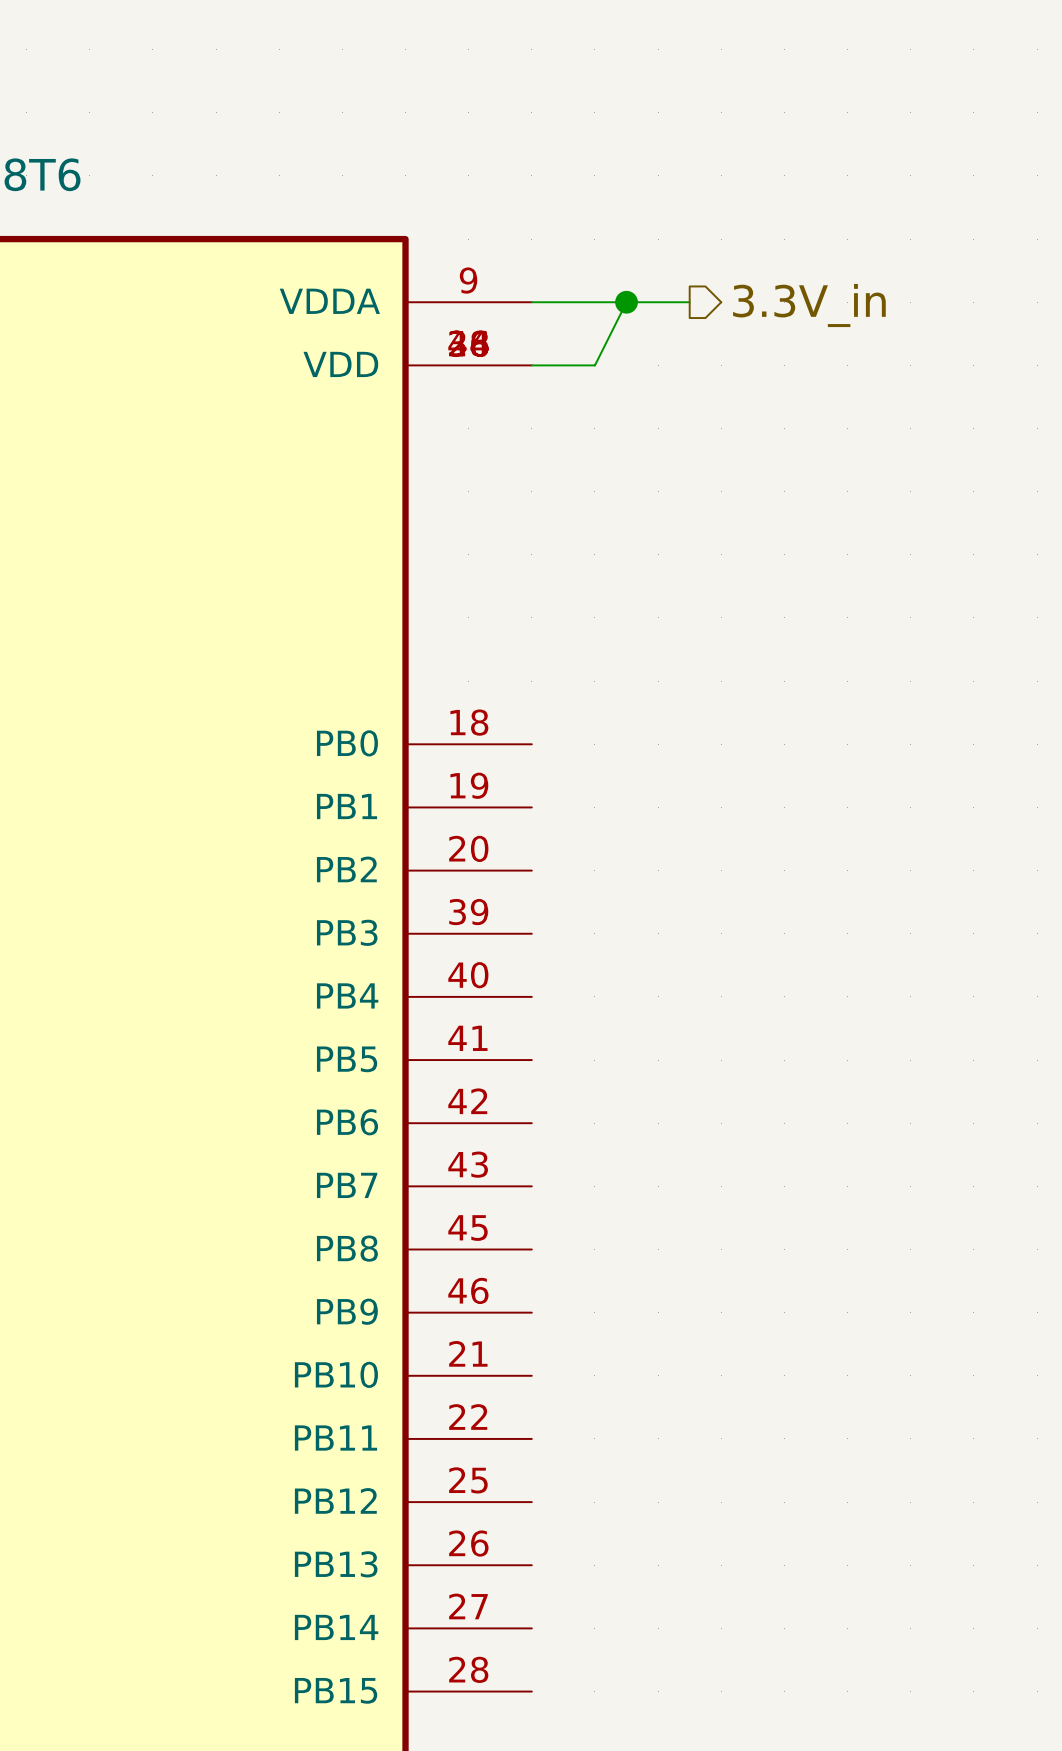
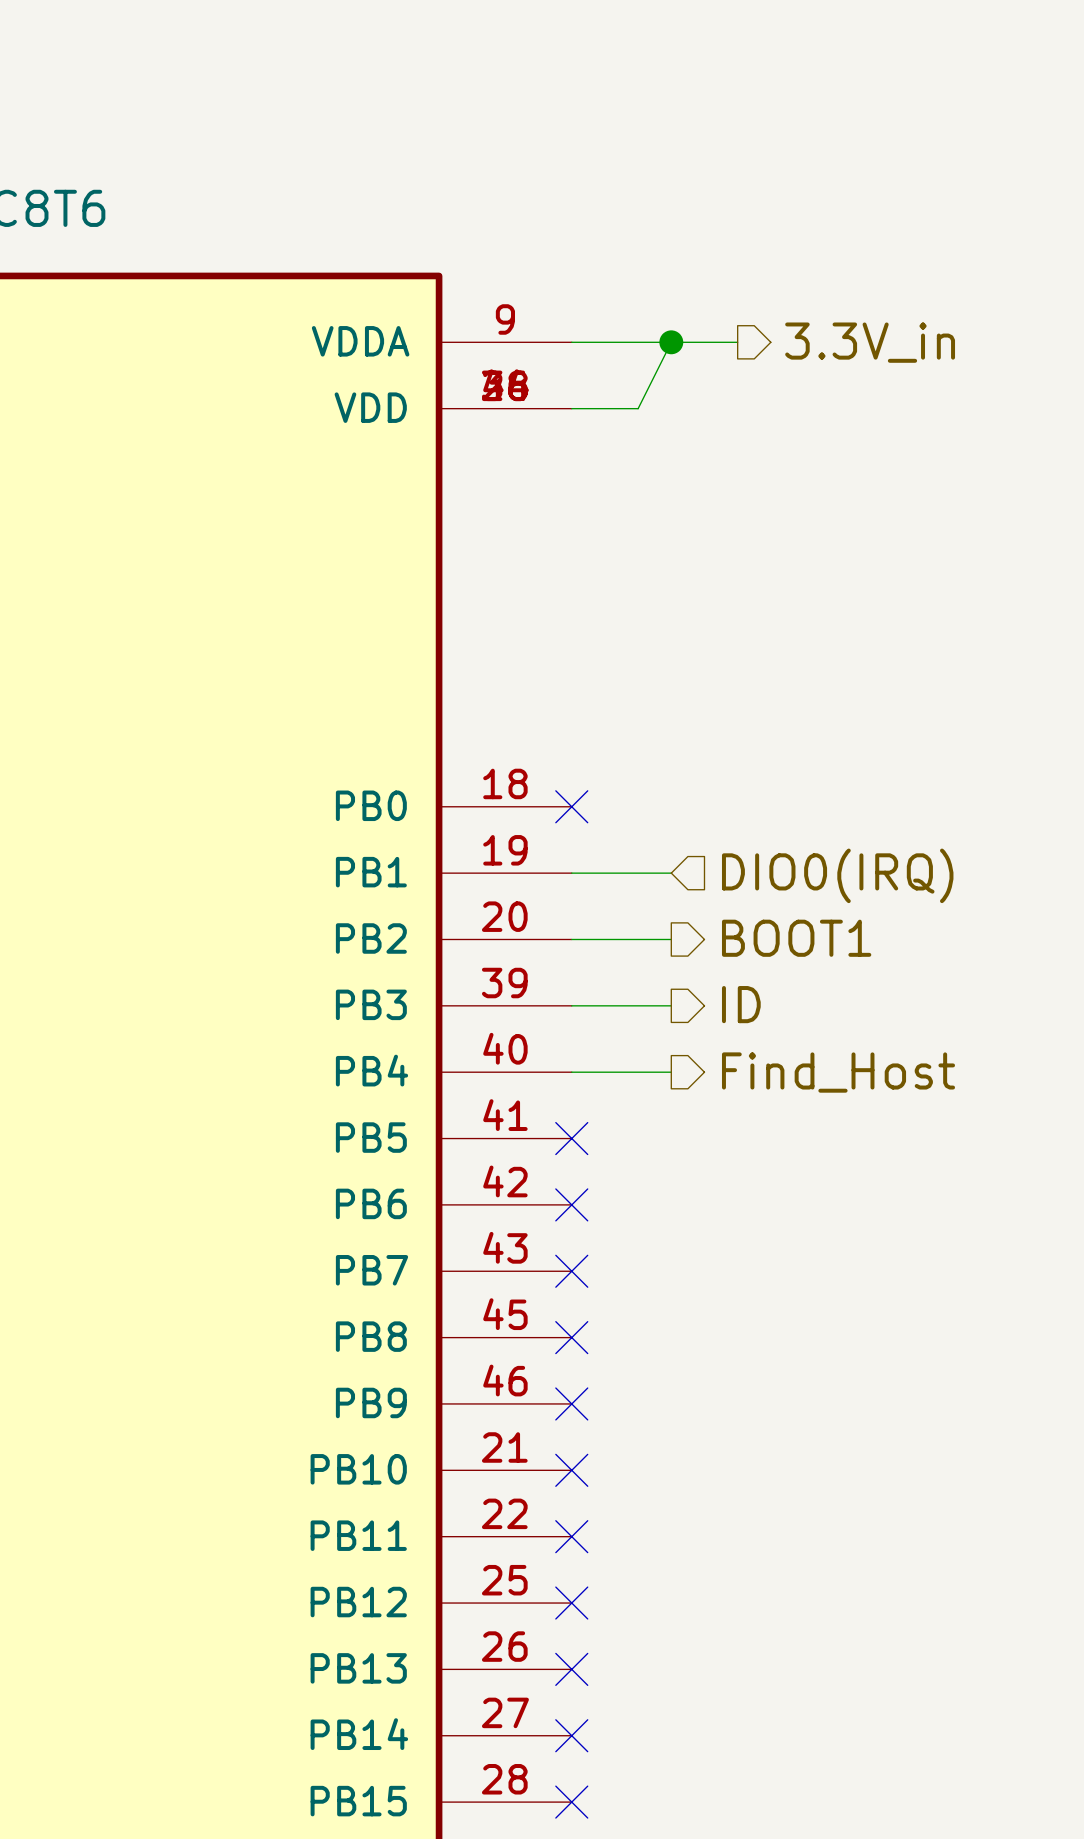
no-connect mark: none -> (571, 806)
wire: none -> (571, 873) (671, 873)
hierarchical label: none -> DIO0(IRQ) (837, 875)
hierarchical label: none -> BOOT1 (796, 938)
wire: none -> (571, 939) (671, 939)
hierarchical label: none -> ID (741, 1004)
wire: none -> (571, 1005) (671, 1005)
wire: none -> (571, 1072) (671, 1072)
hierarchical label: none -> Find_Host (838, 1072)
no-connect mark: none -> (571, 1138)
no-connect mark: none -> (571, 1204)
no-connect mark: none -> (571, 1271)
no-connect mark: none -> (571, 1337)
no-connect mark: none -> (571, 1403)
no-connect mark: none -> (571, 1470)
no-connect mark: none -> (571, 1536)
no-connect mark: none -> (571, 1603)
no-connect mark: none -> (571, 1669)
no-connect mark: none -> (571, 1735)
no-connect mark: none -> (571, 1802)

